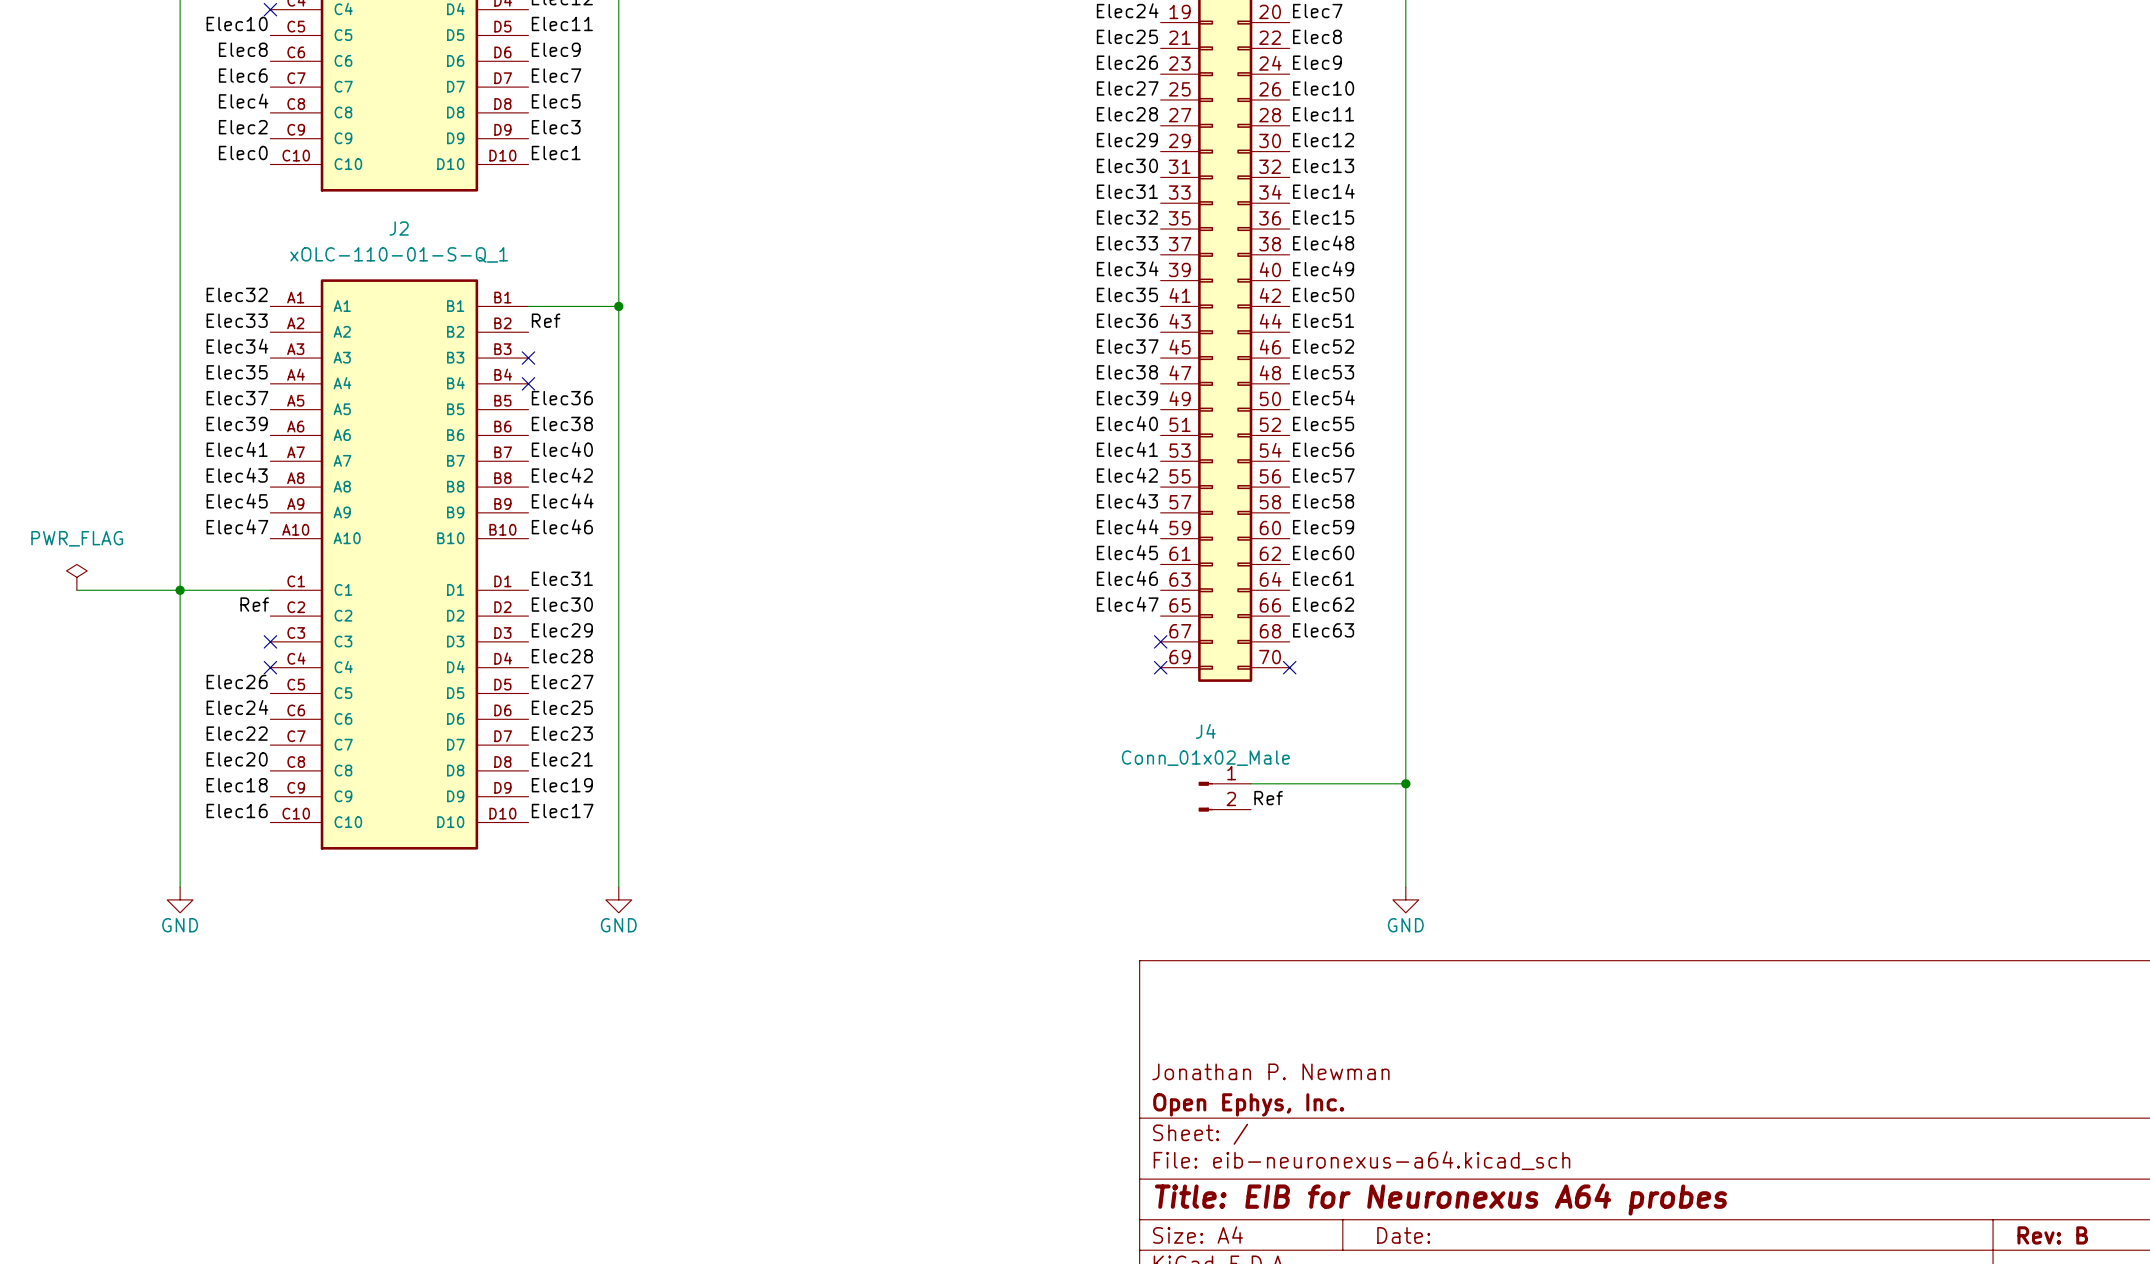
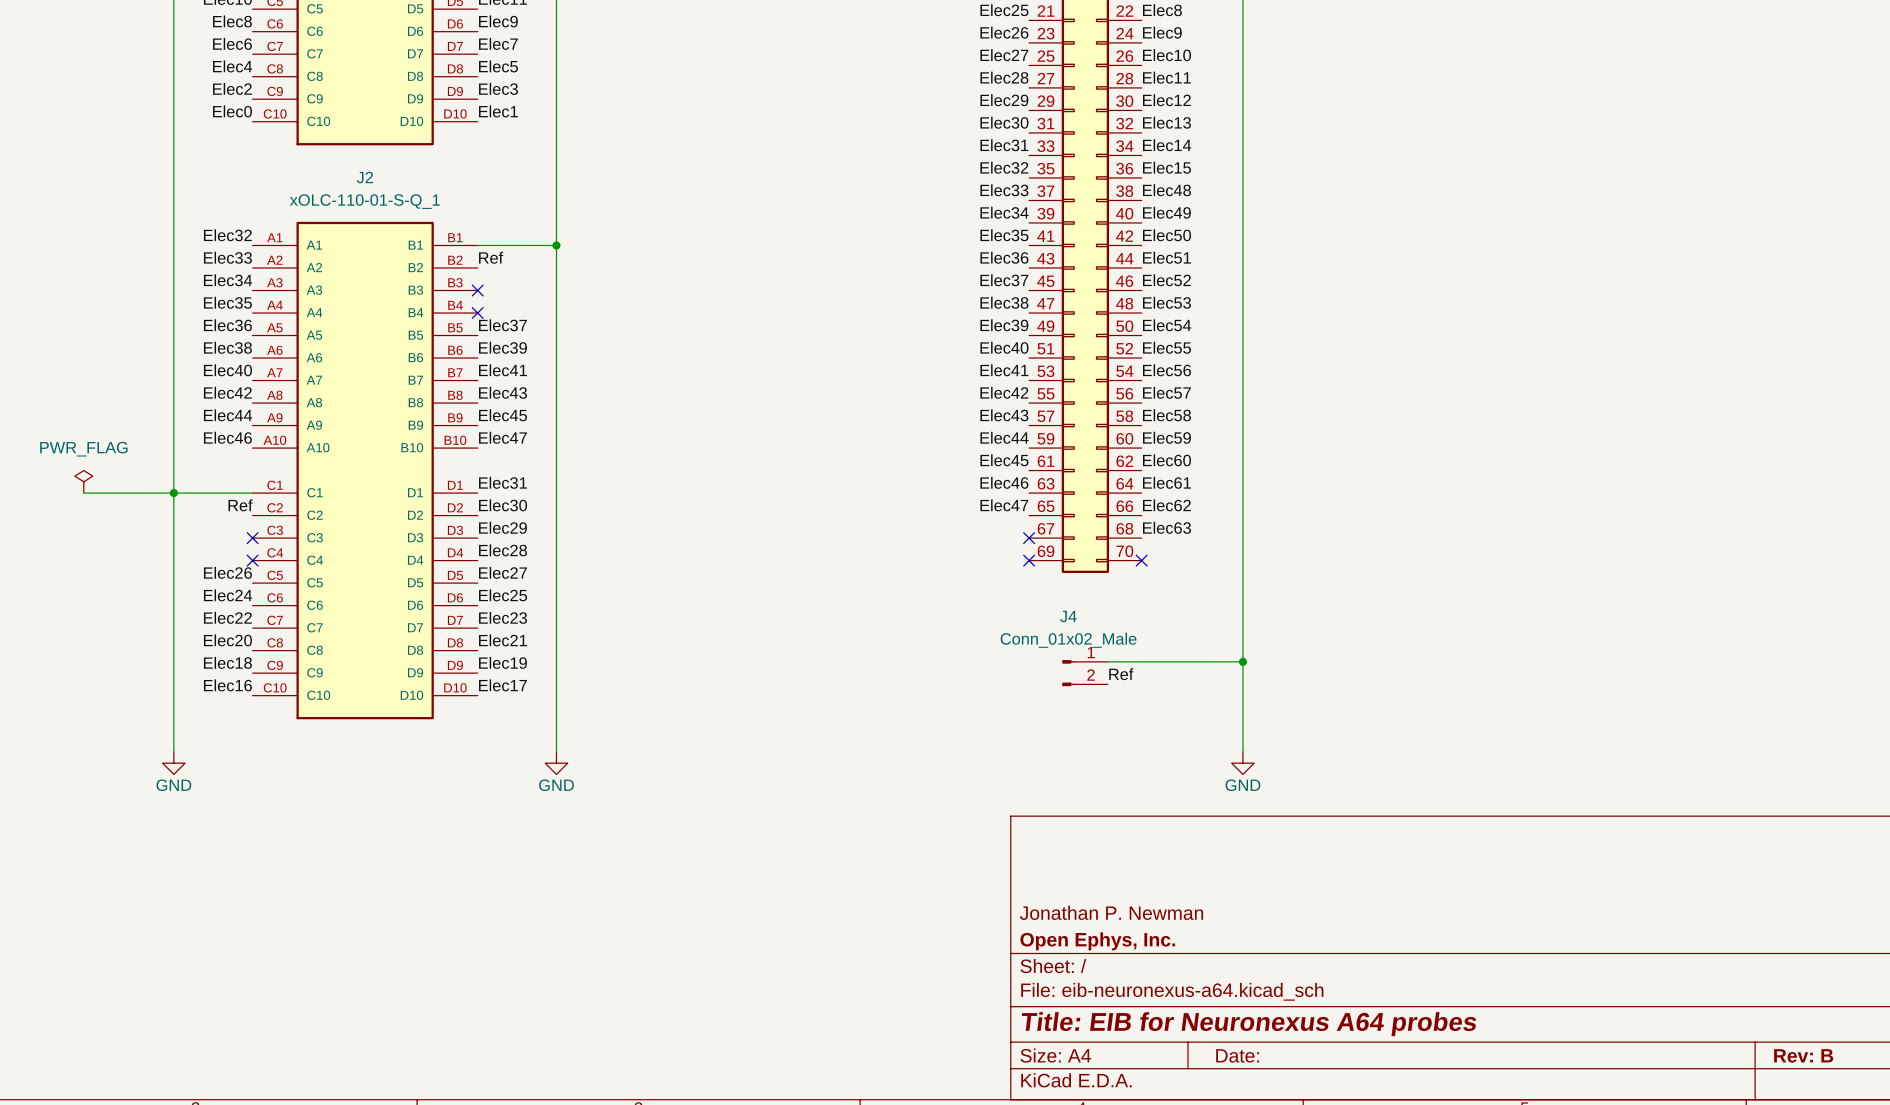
label: Elec37 (237, 398) -> Elec36 (227, 325)
label: Elec36 (562, 398) -> Elec37 (502, 325)
label: Elec39 (237, 423) -> Elec38 (227, 347)
label: Elec38 (562, 423) -> Elec39 (502, 347)
label: Elec41 (237, 449) -> Elec40 (227, 370)
label: Elec40 (562, 449) -> Elec41 (502, 370)
label: Elec43 (237, 475) -> Elec42 (227, 392)
label: Elec42 (562, 475) -> Elec43 (503, 392)
label: Elec45 (237, 501) -> Elec44 (228, 415)
label: Elec44 (562, 501) -> Elec45 (503, 415)
label: Elec47 (237, 526) -> Elec46 (227, 437)
label: Elec46 (562, 526) -> Elec47 (502, 437)

